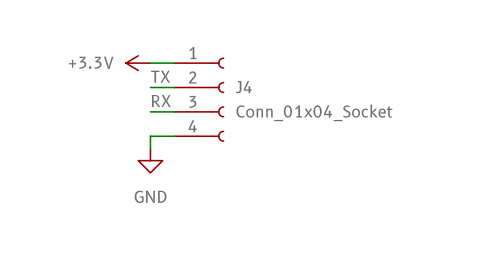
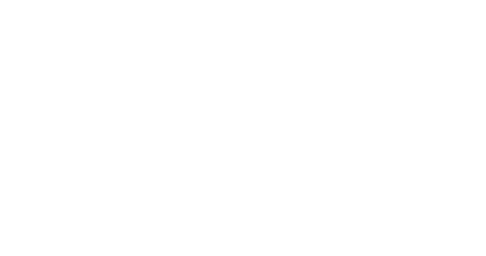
power symbol: +3.3V (138, 63) -> none
wire: (150, 63) (174, 63) -> none
label: TX (160, 76) -> none
wire: (150, 87) (174, 87) -> none
J4: Conn_01x04_Socket (199, 99) -> none
label: RX (161, 101) -> none
wire: (150, 111) (174, 111) -> none
wire: (174, 136) (150, 136) (150, 148) -> none
power symbol: GND (150, 160) -> none

